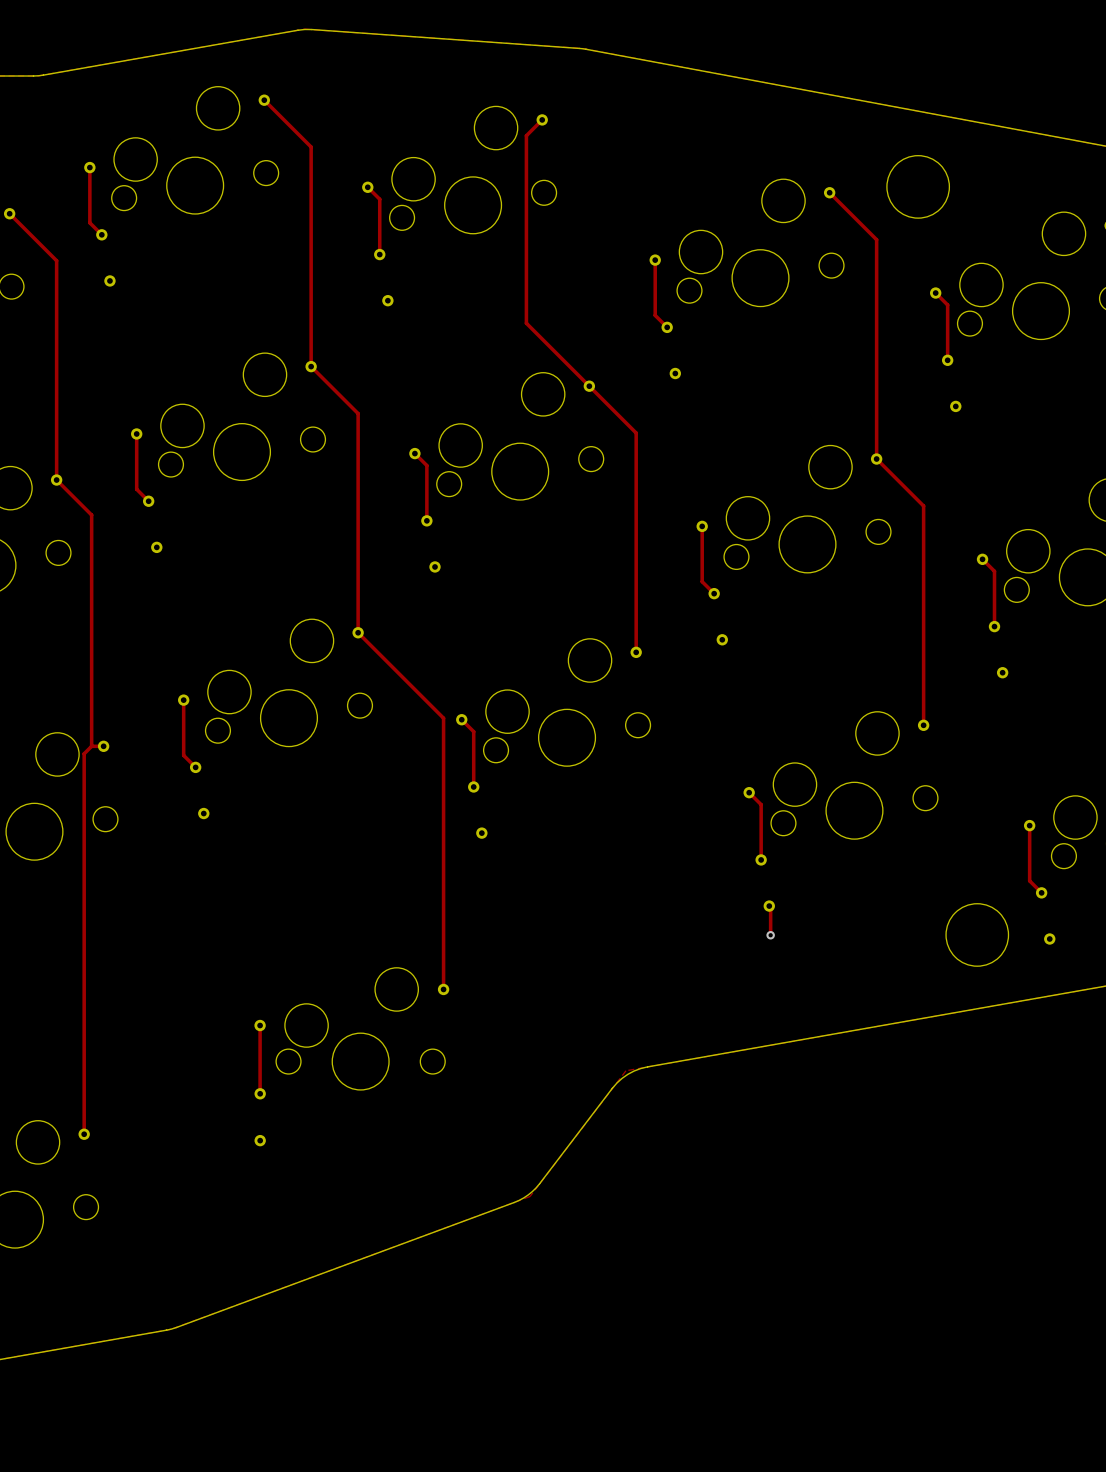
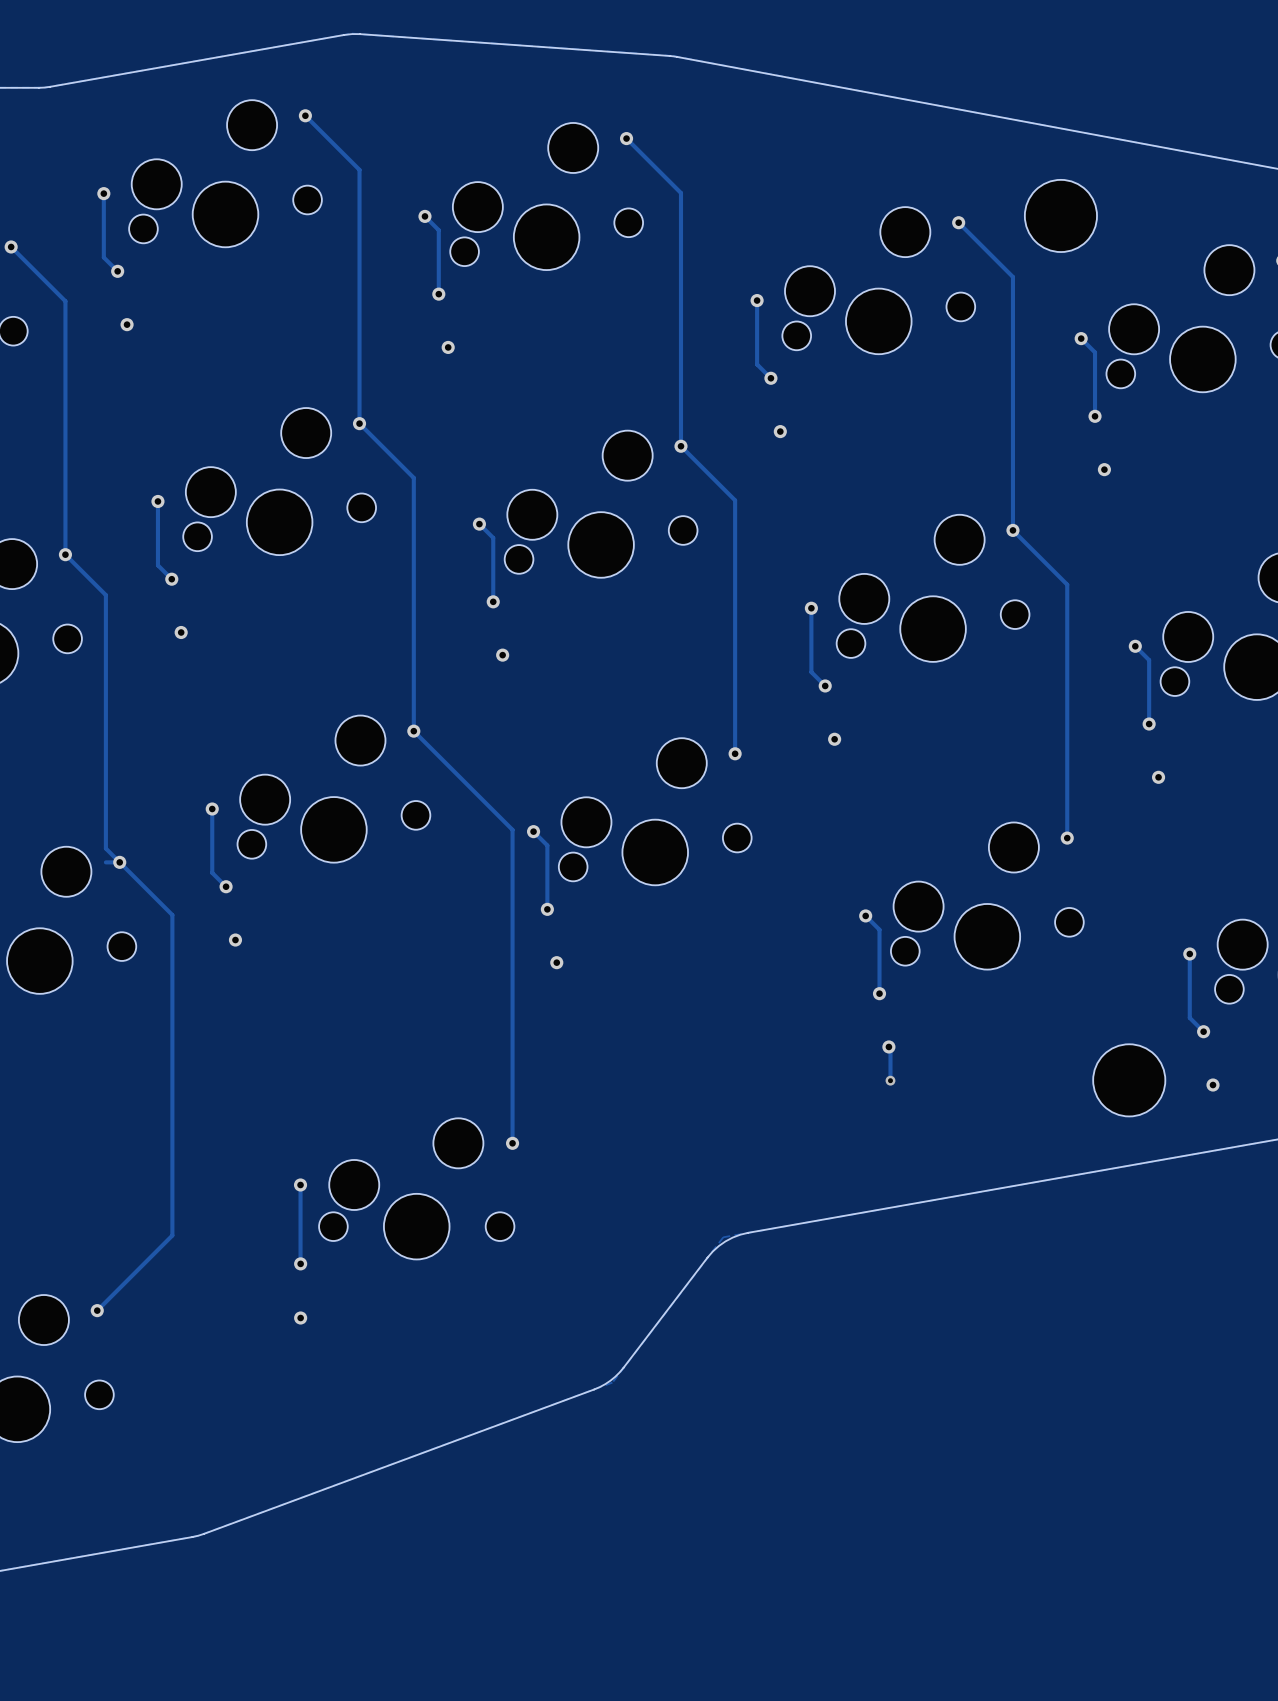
track: (542, 119) (526, 135) (526, 323) (589, 386) -> (626, 138) (680, 193) (680, 446)
track: (91, 734) (91, 746) (84, 753) (84, 1134) -> (105, 848) (172, 915) (172, 1235) (97, 1310)

